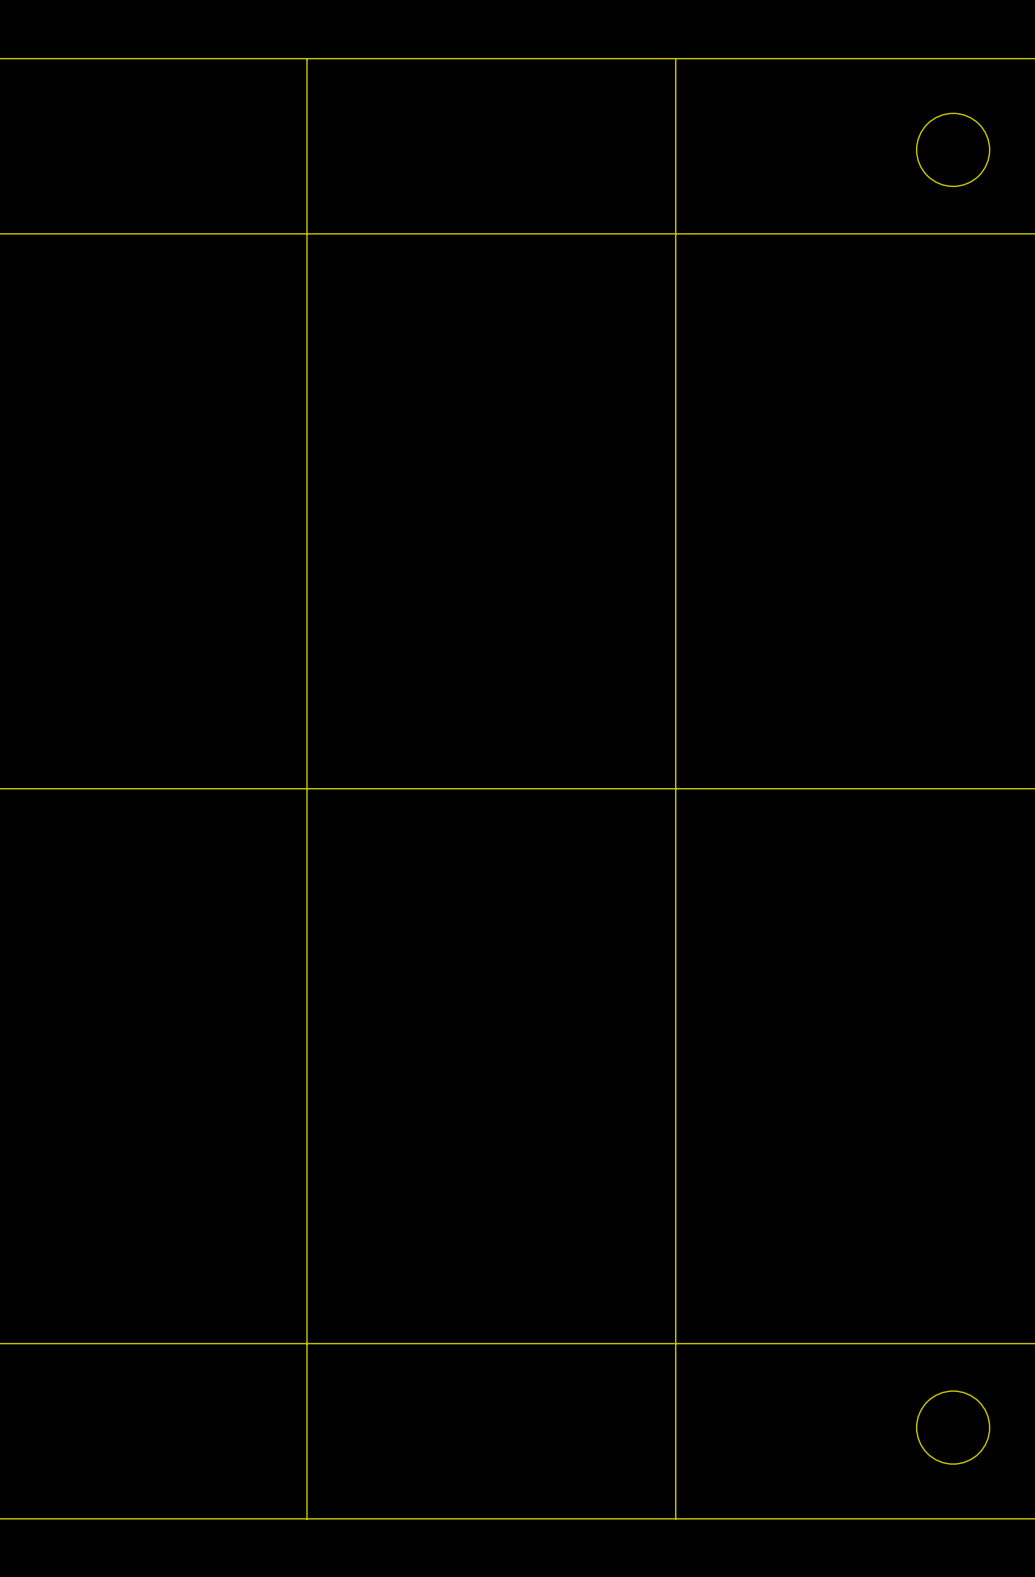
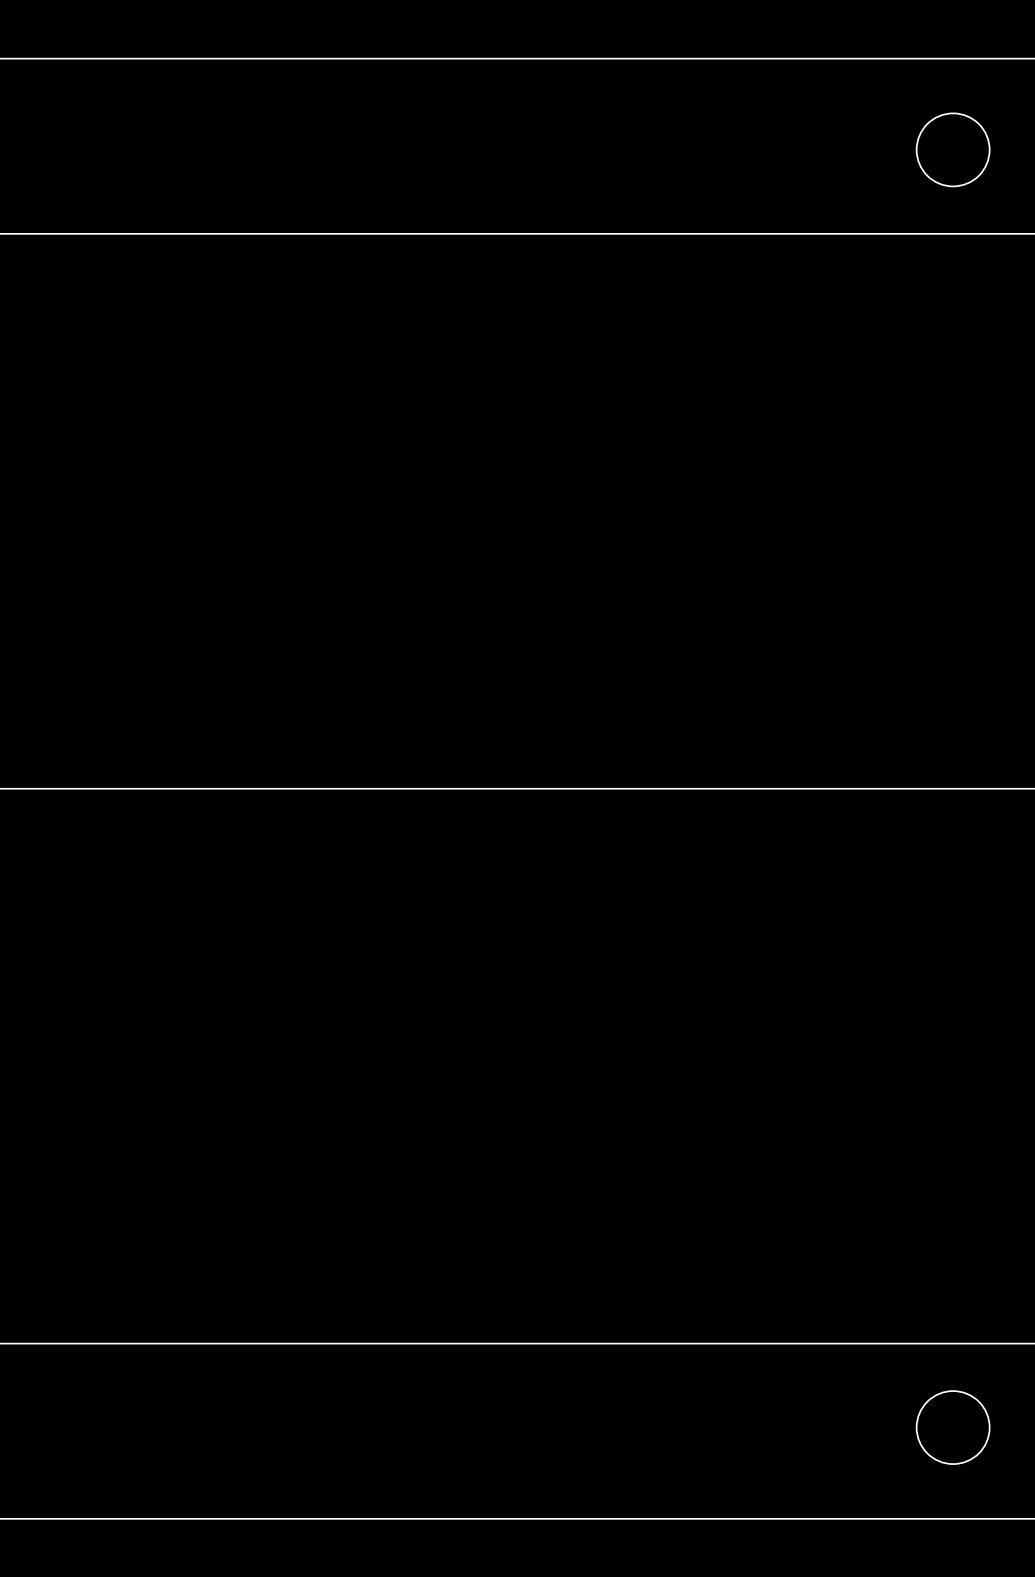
board edge: (307, 58) (307, 1518) -> none
board edge: (675, 58) (675, 1518) -> none

